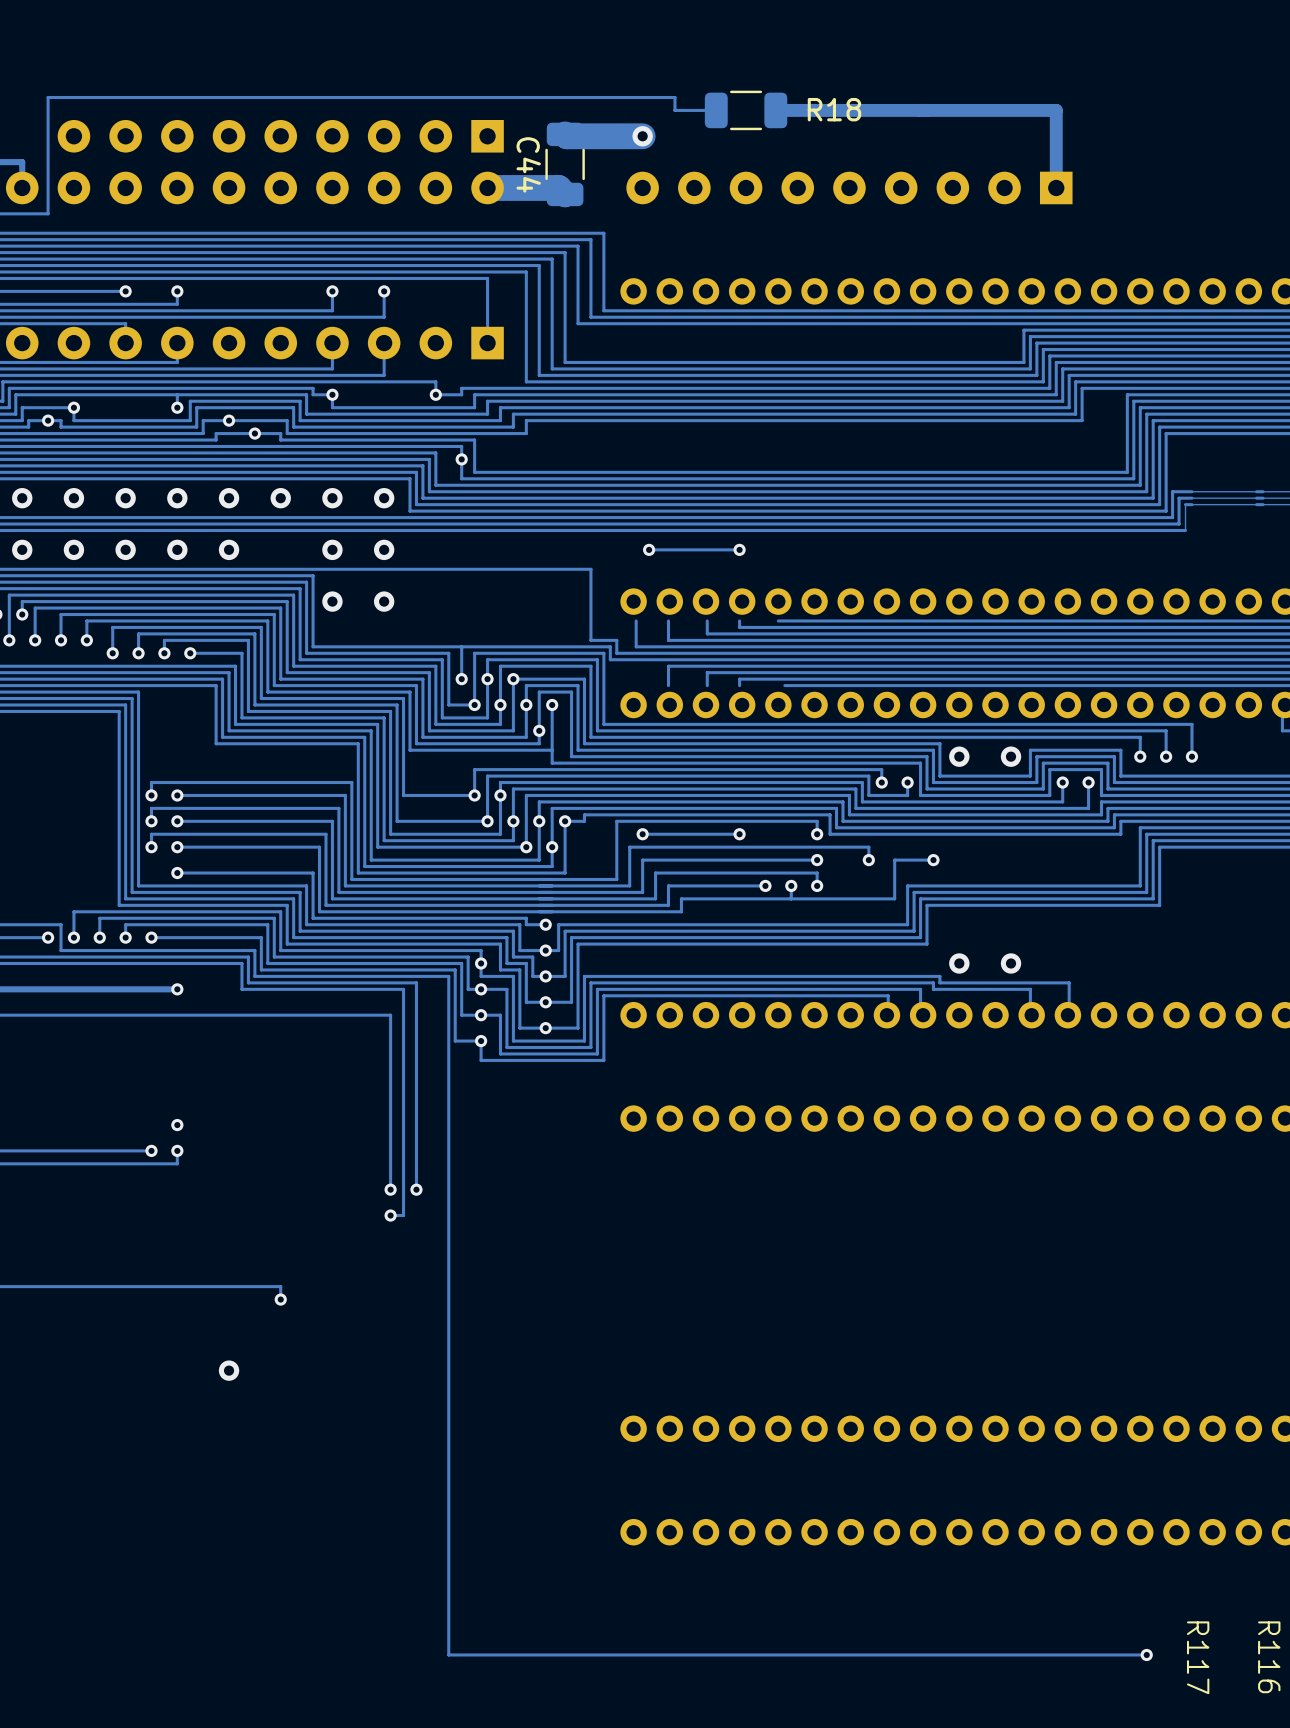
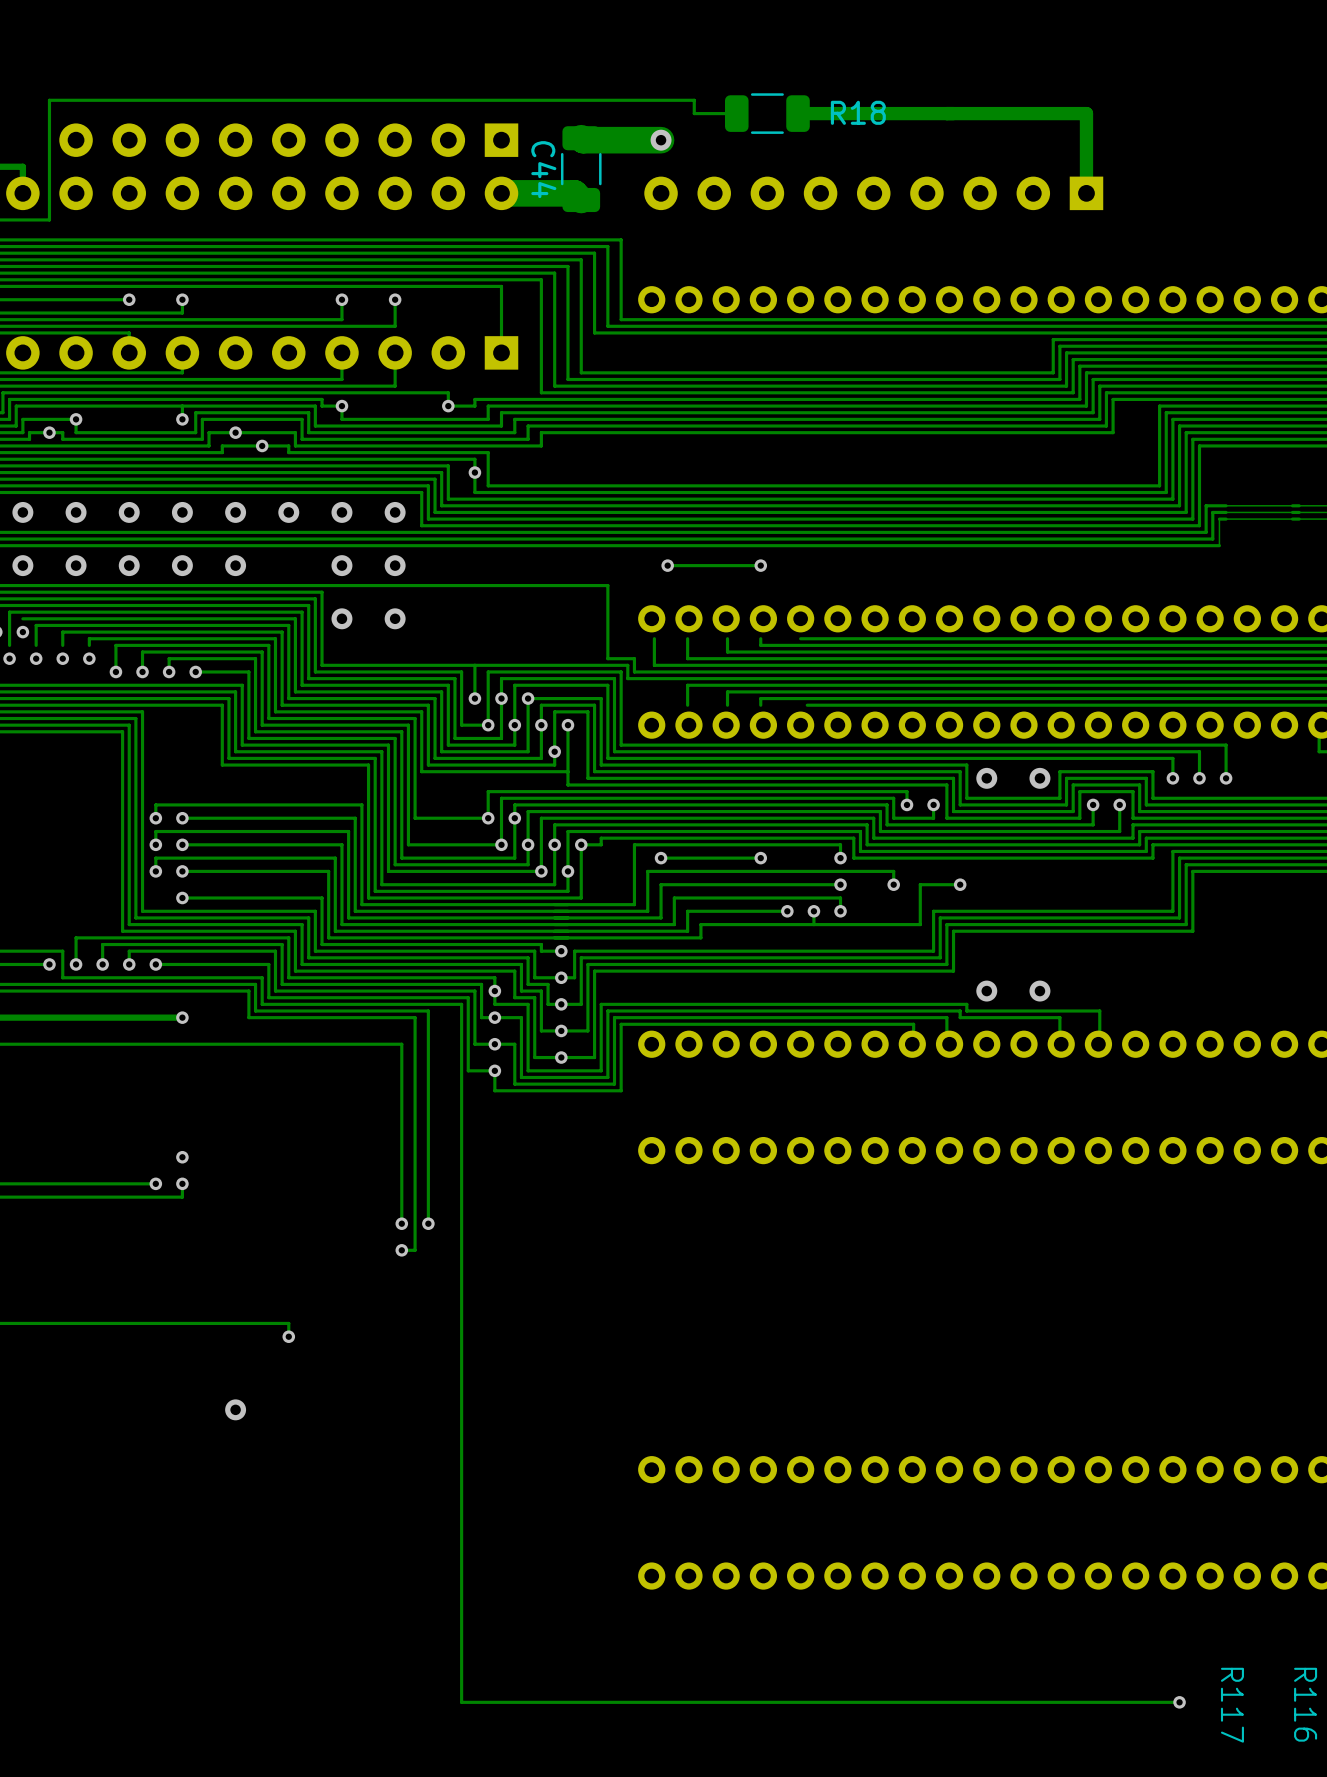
track: (22, 601) (22, 614) -> none
track: (9, 627) (9, 640) -> none
track: (35, 627) (35, 640) -> none
track: (61, 627) (61, 640) -> none
track: (86, 627) (86, 640) -> none

